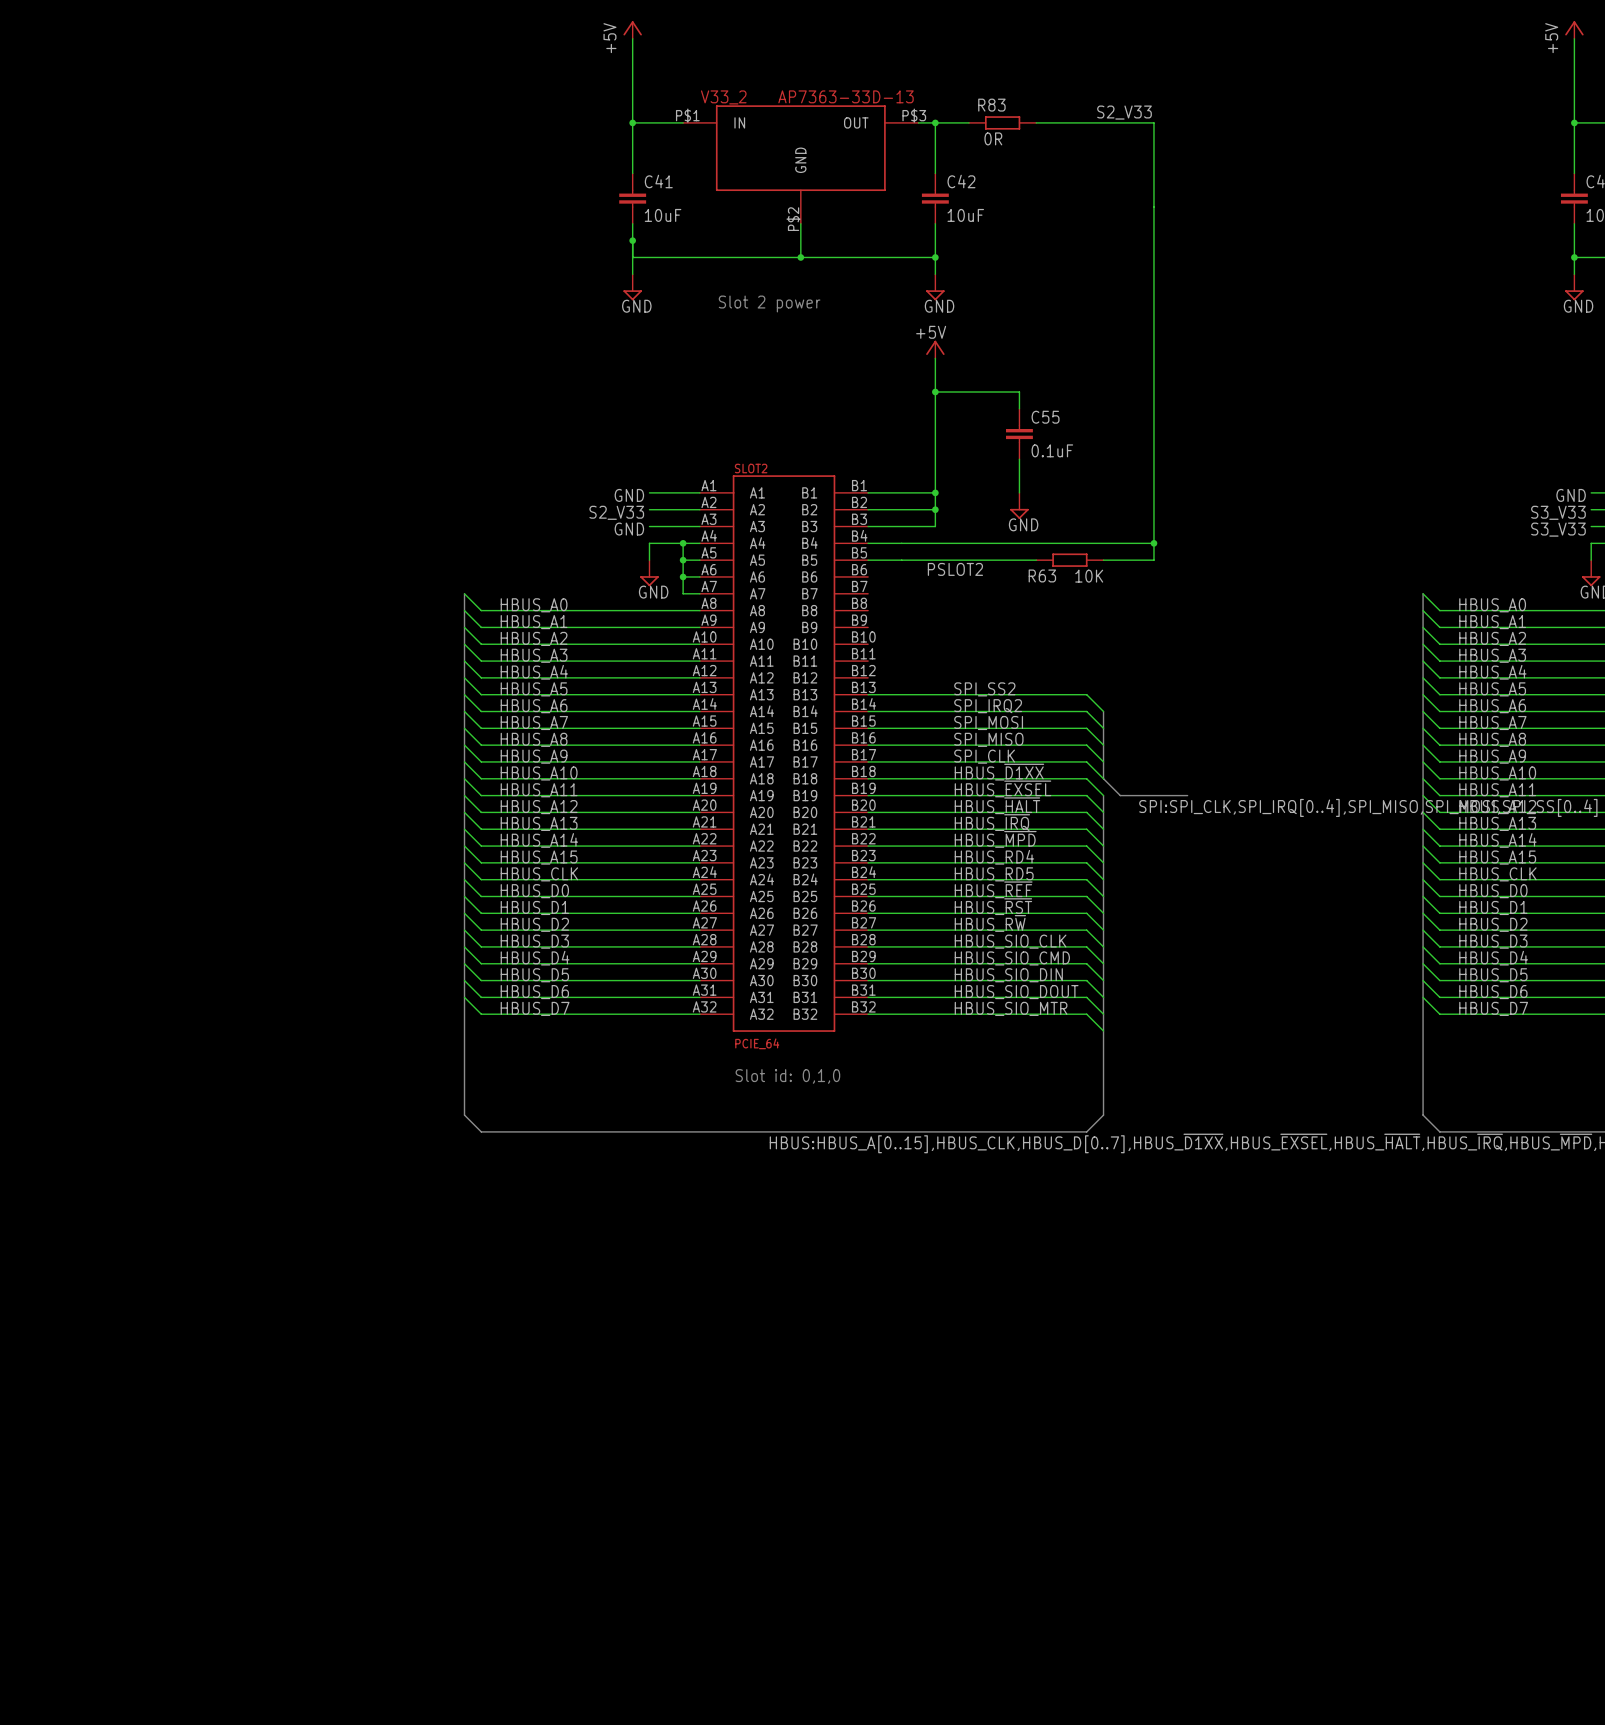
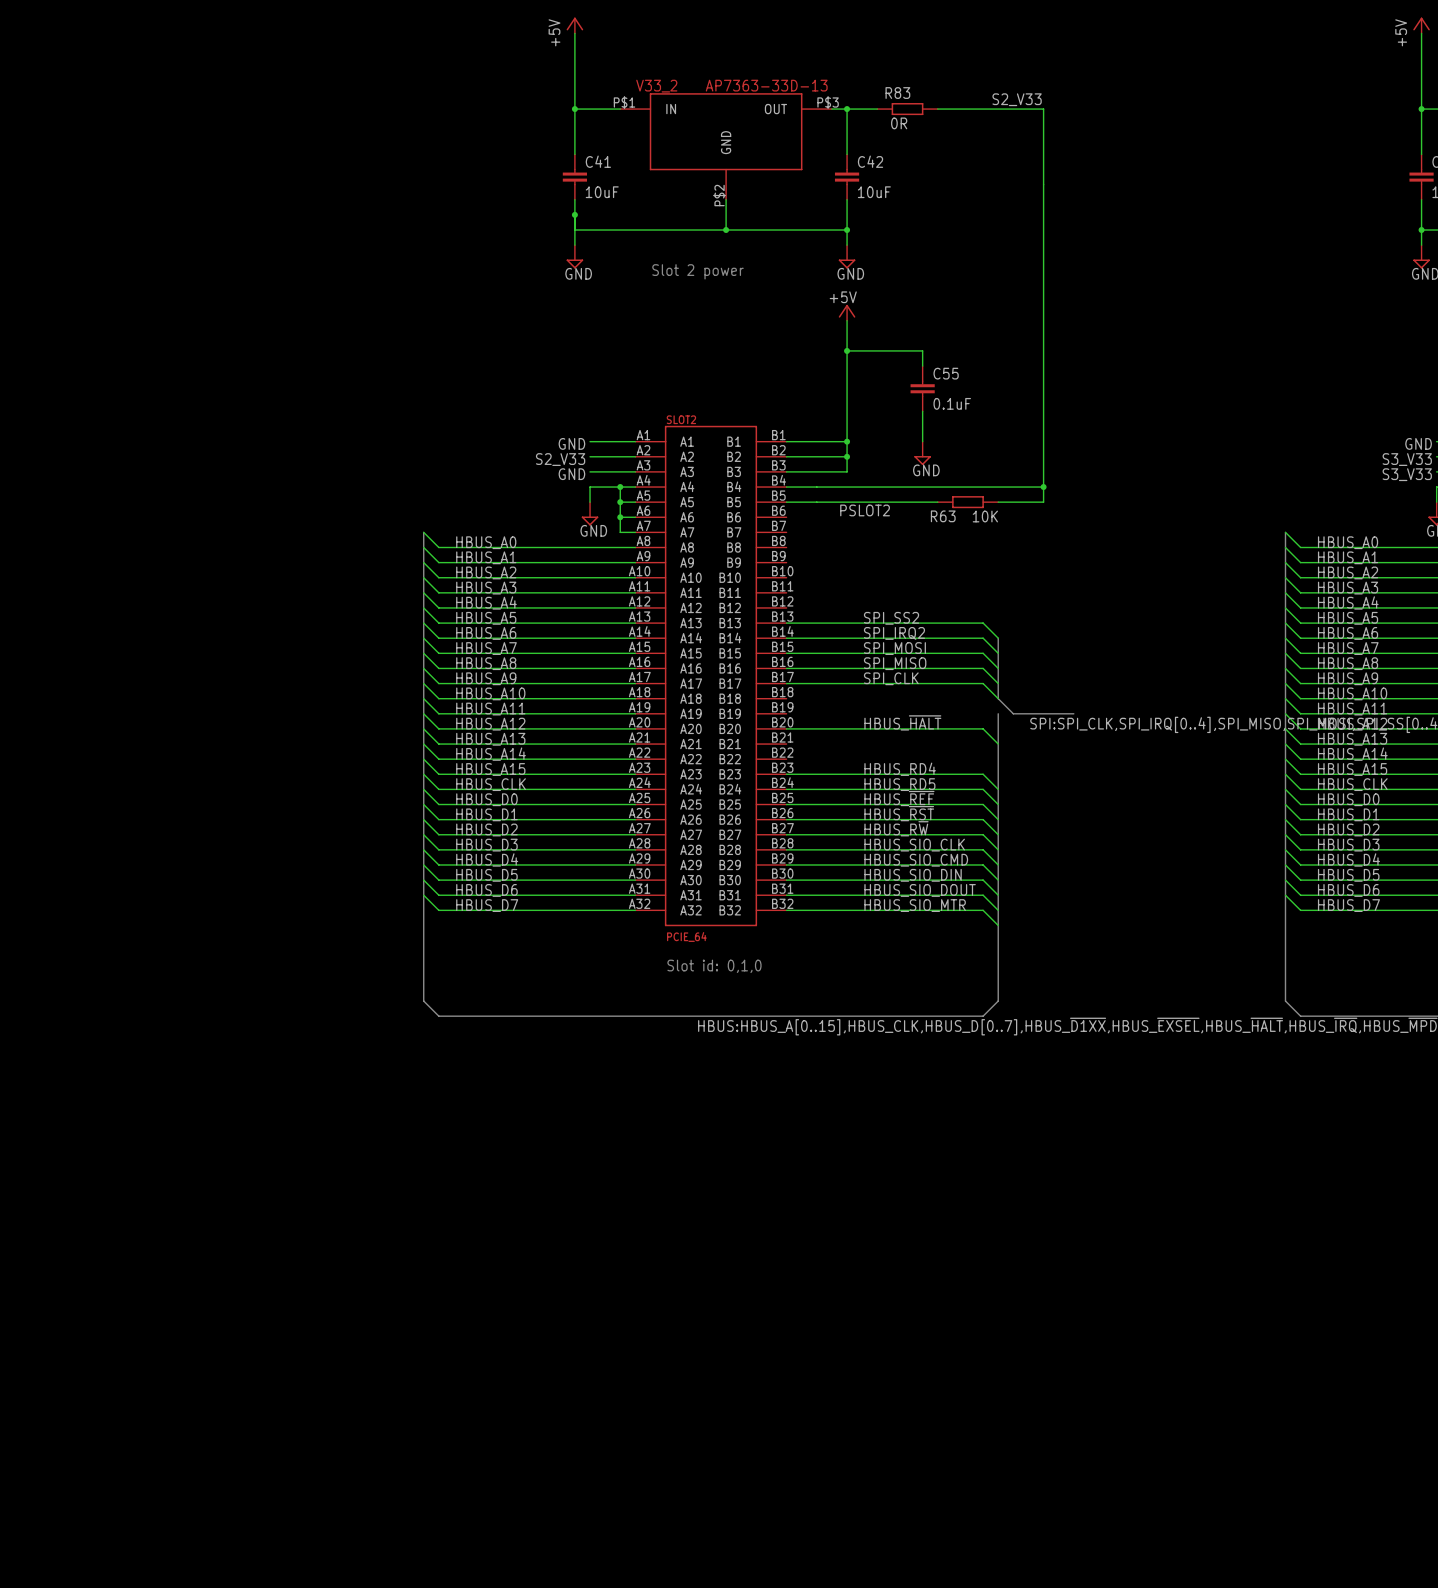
label: HBUS_~{D1XX} (999, 772) -> none
wire: (868, 778) (1086, 778) (1103, 795) -> none
label: HBUS_~{EXSEL} (1003, 788) -> none
wire: (868, 795) (1086, 795) (1103, 812) -> none
label: HBUS_~{IRQ} (992, 822) -> none
wire: (868, 829) (1086, 829) (1103, 846) -> none
label: HBUS_~{MPD} (995, 839) -> none
wire: (868, 846) (1086, 846) (1103, 862) -> none

